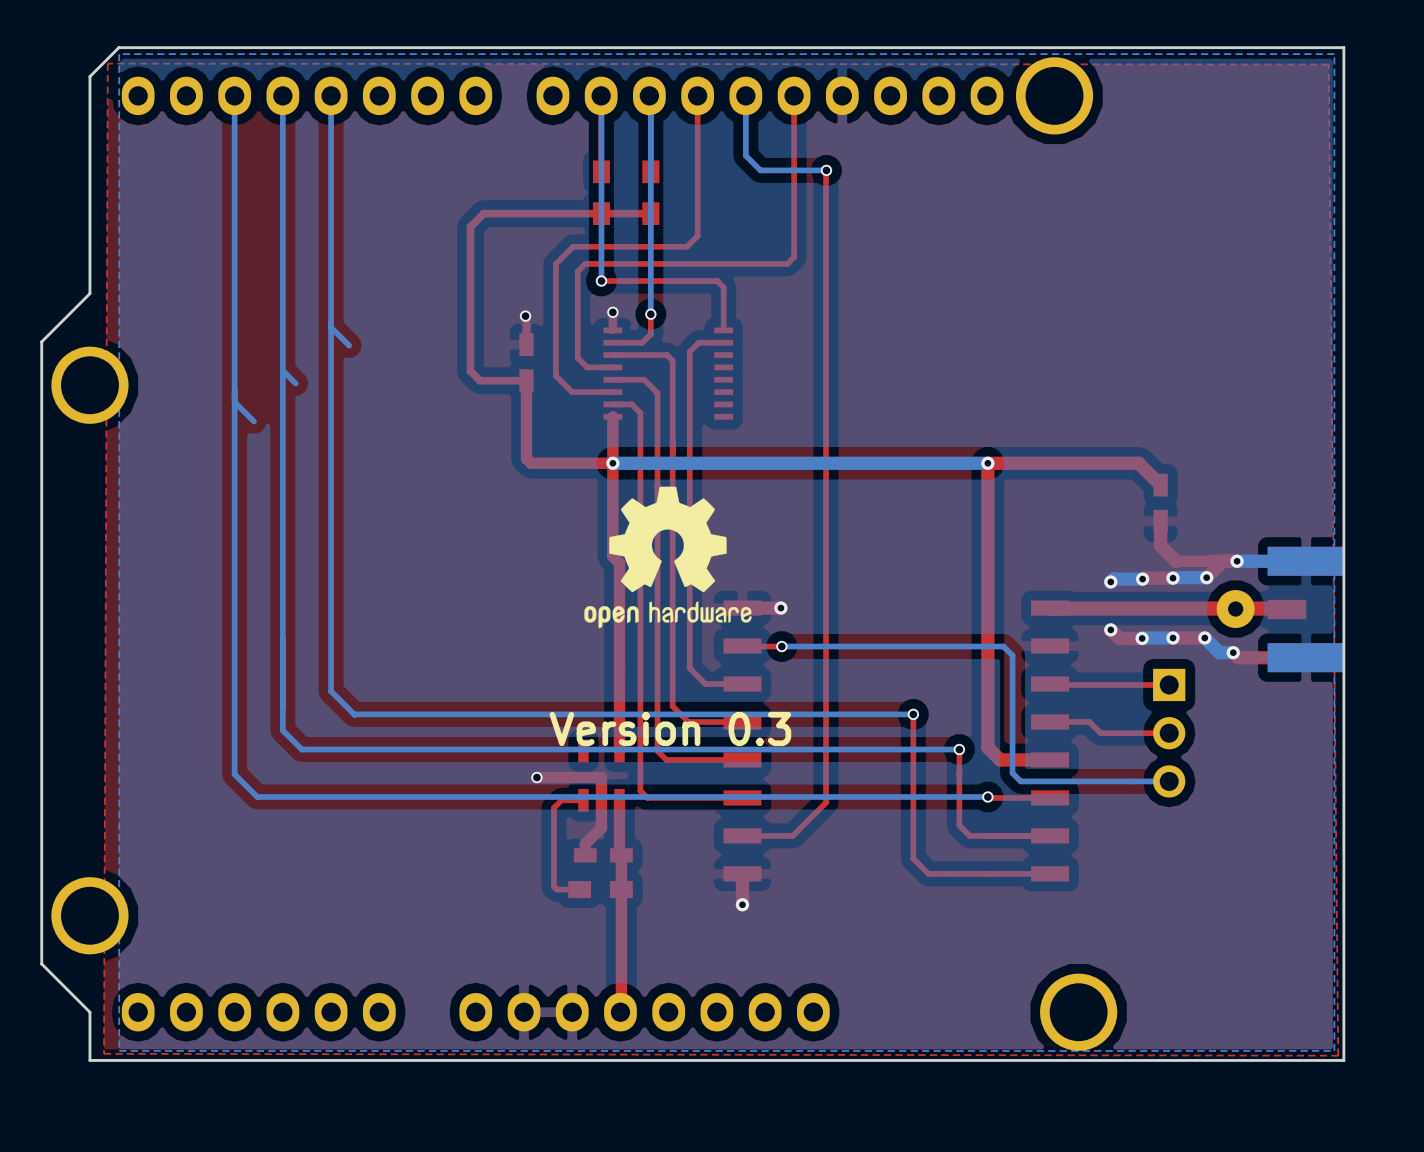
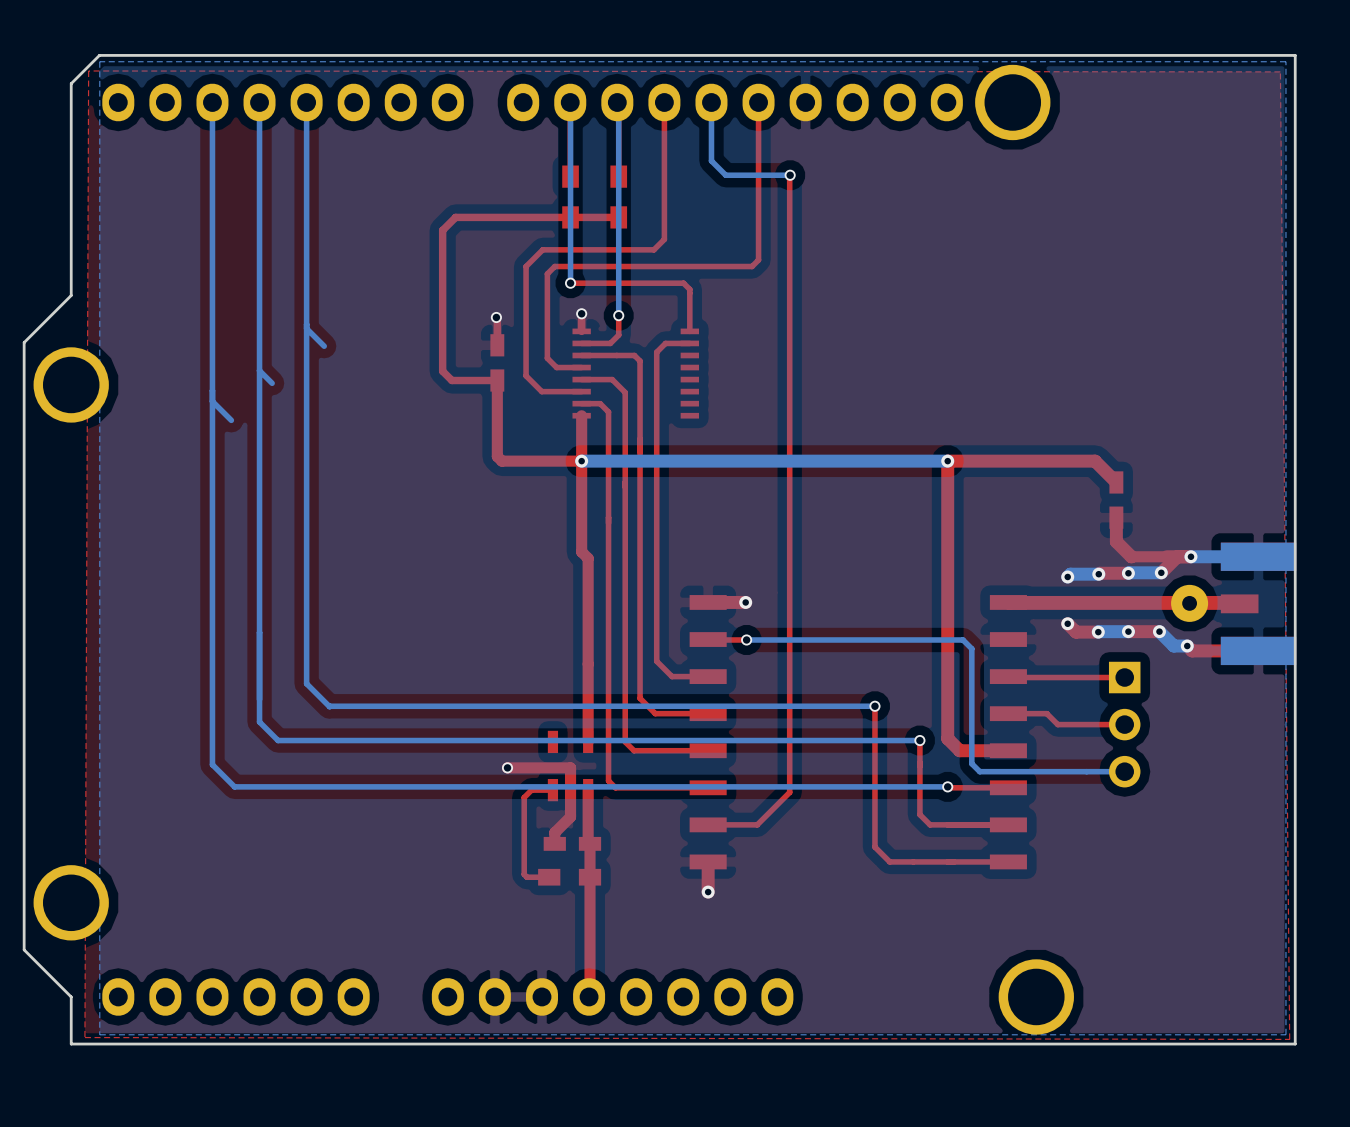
drawing: [584, 486, 752, 629] -> none
text: Version 0.3 (670, 729) -> none

